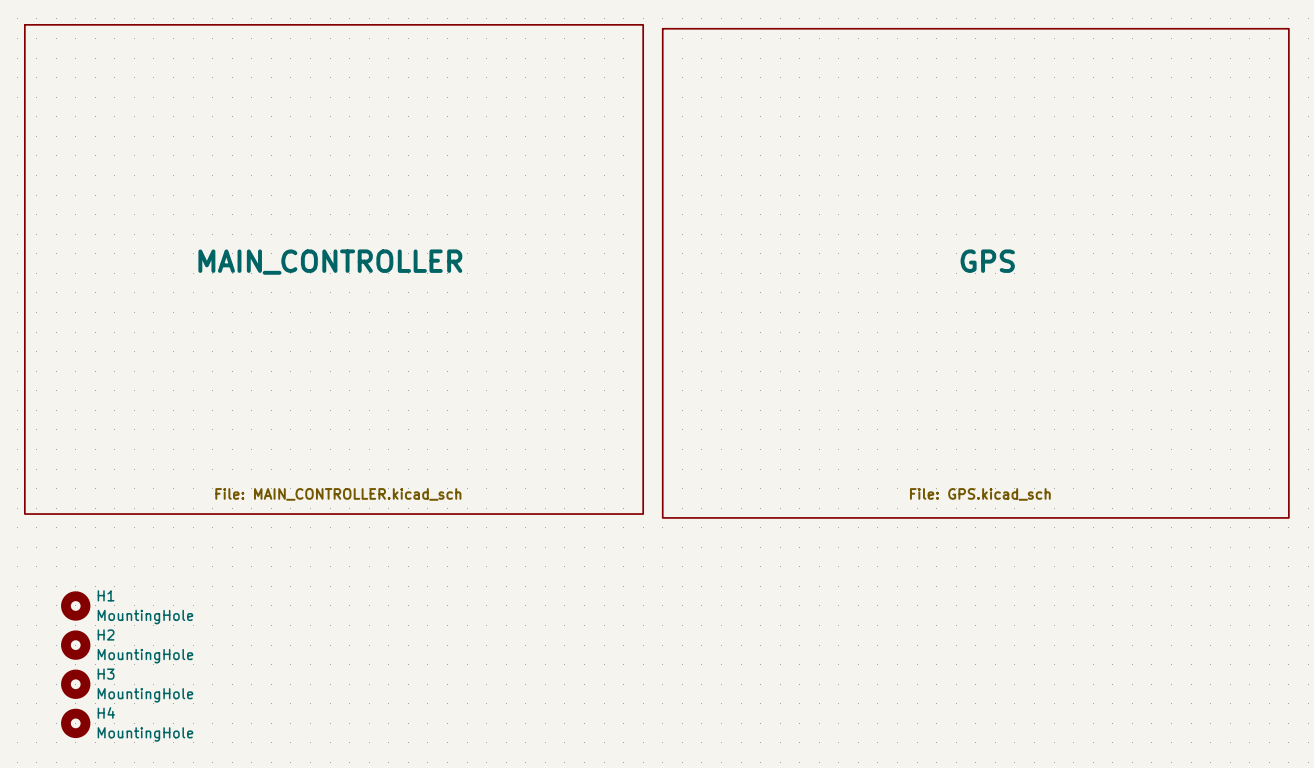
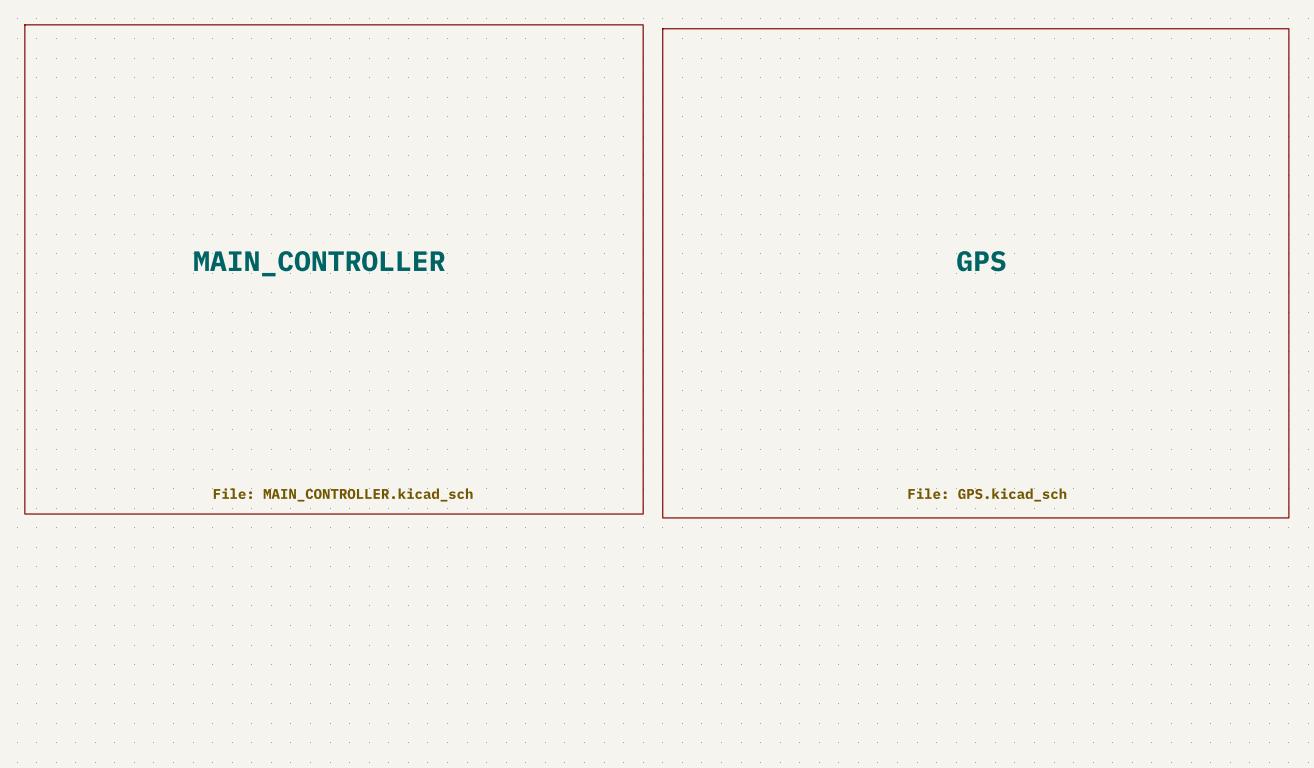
H1: MountingHole (75, 605) -> none
H2: MountingHole (75, 645) -> none
H3: MountingHole (75, 684) -> none
H4: MountingHole (75, 723) -> none

